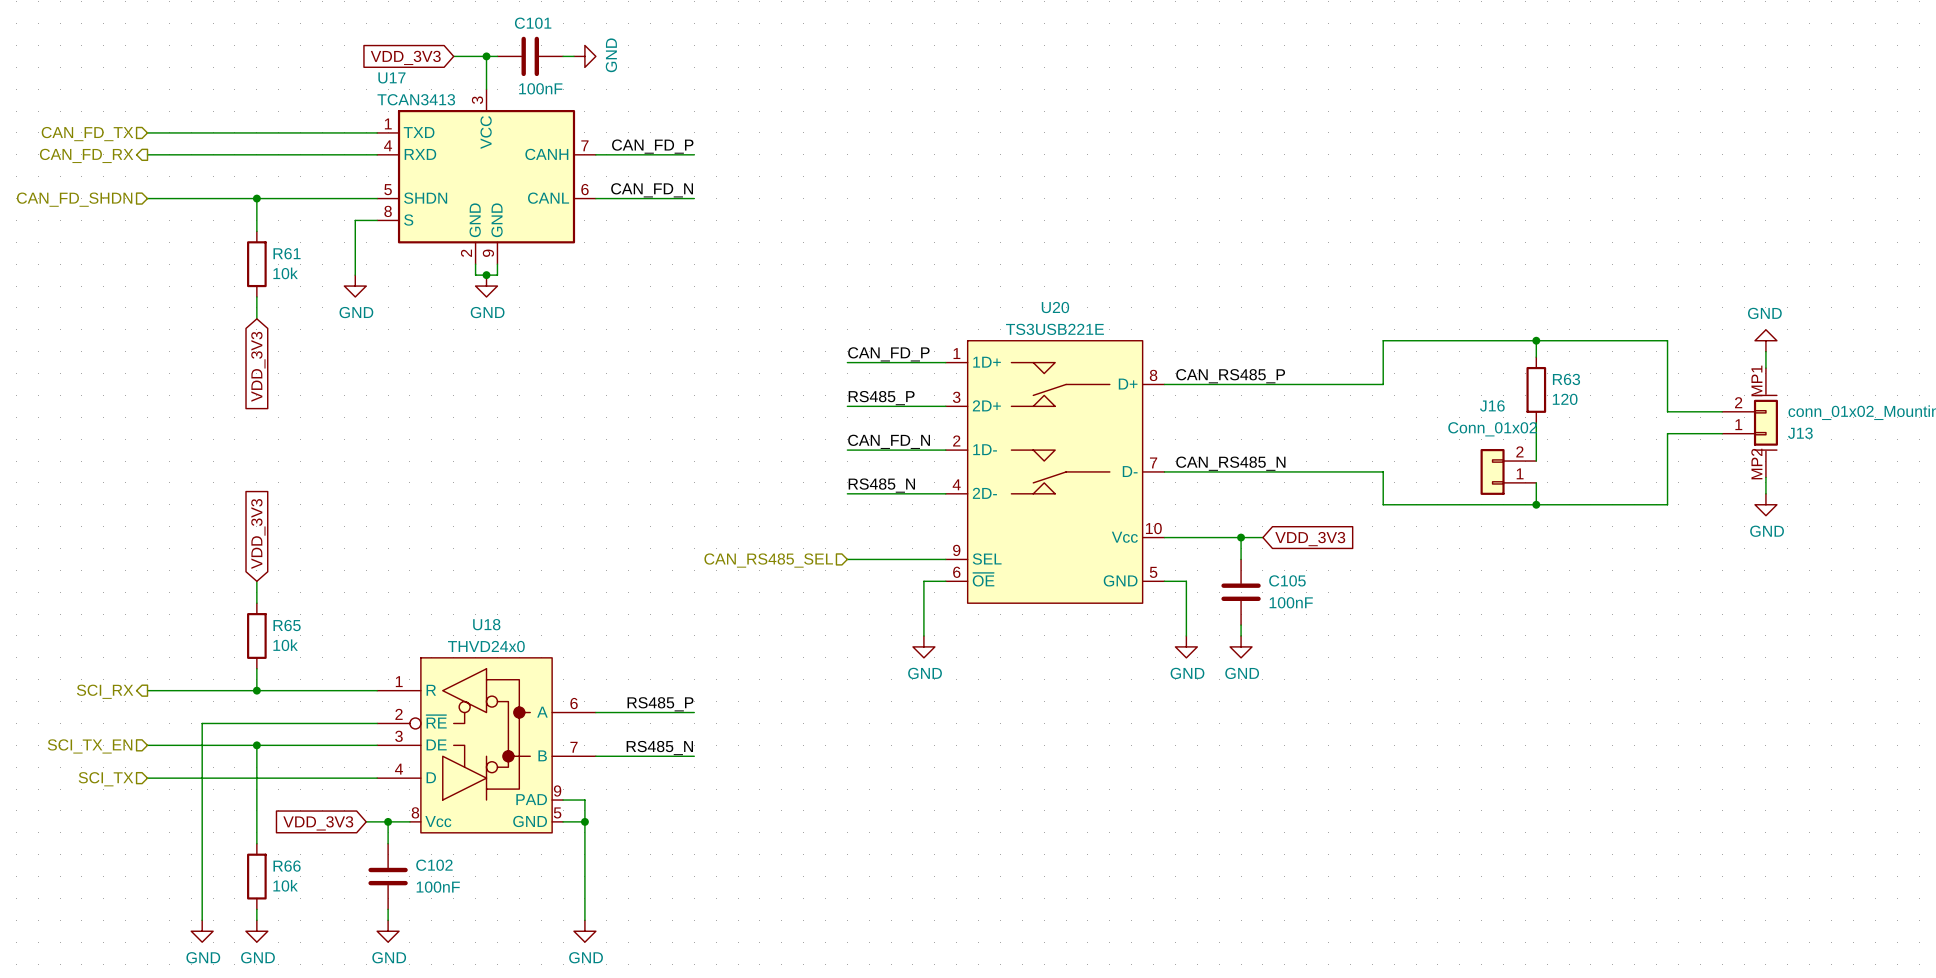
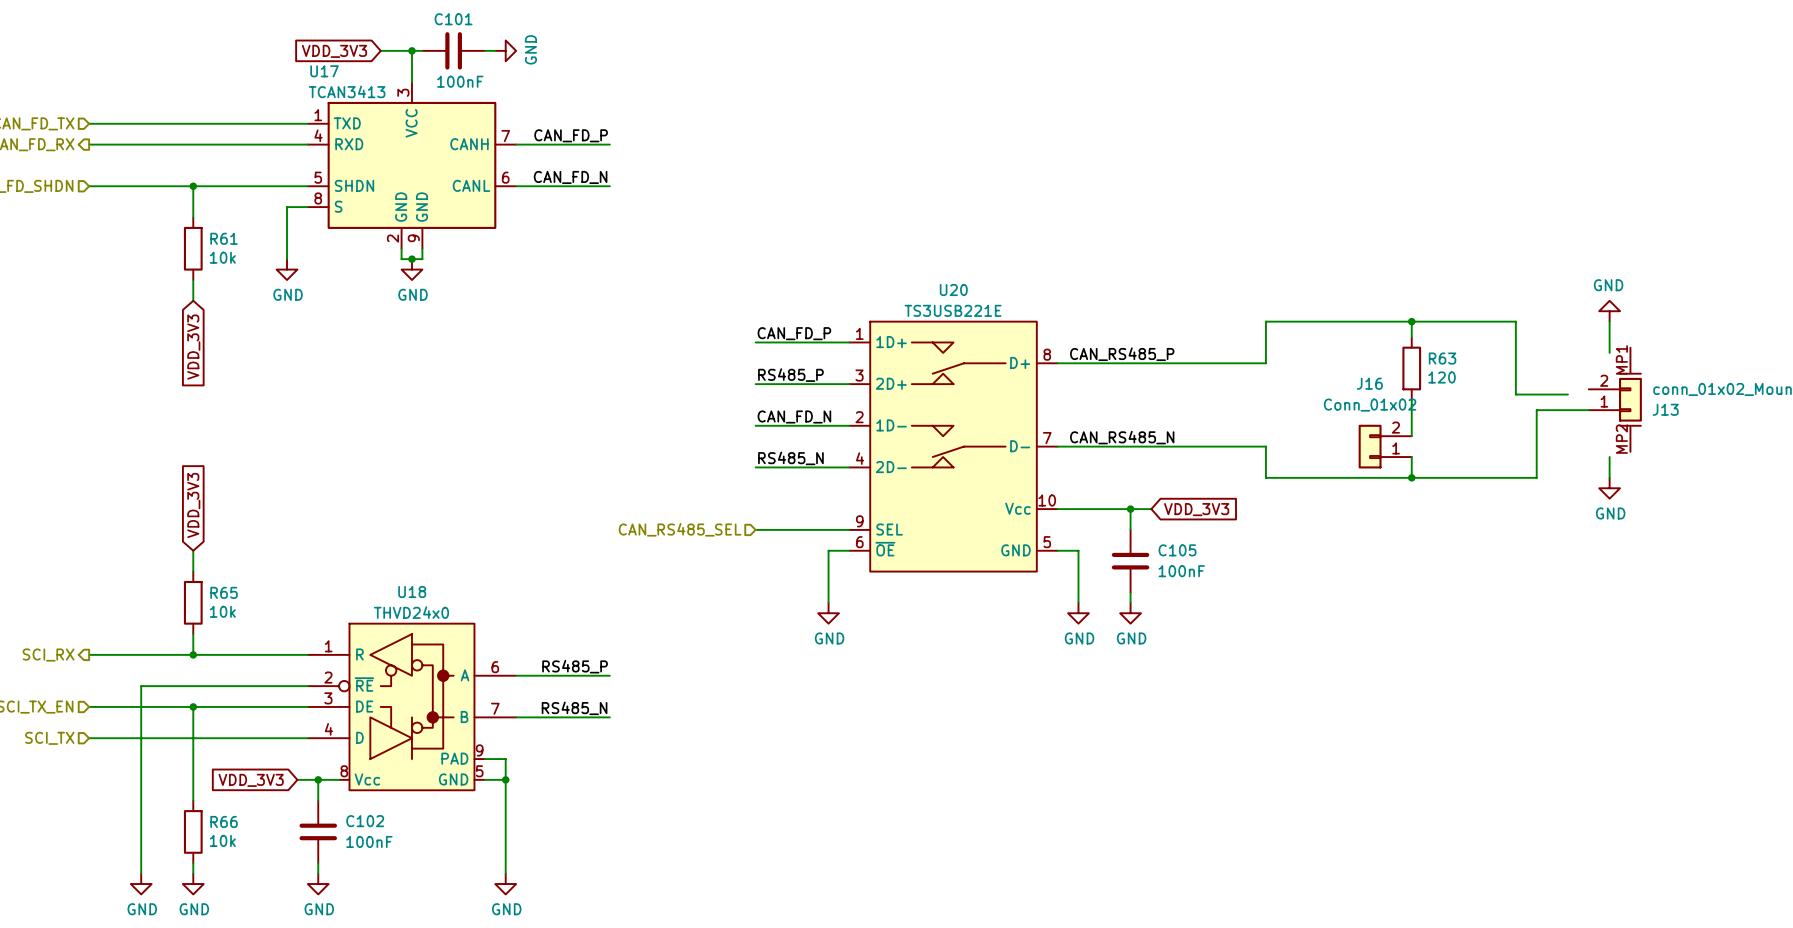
wire: (1645, 340) (1667, 340) (1667, 411) (1722, 411) -> (1515, 321) (1515, 394) (1567, 394)
wire: none -> (1609, 321) (1609, 352)
power symbol position: GND (1765, 340) -> GND (1609, 311)
wire: (1765, 351) (1765, 368) -> none
wire: (1765, 477) (1765, 493) -> none
wire: none -> (1609, 457) (1609, 477)
power symbol position: GND (1765, 504) -> GND (1609, 488)

